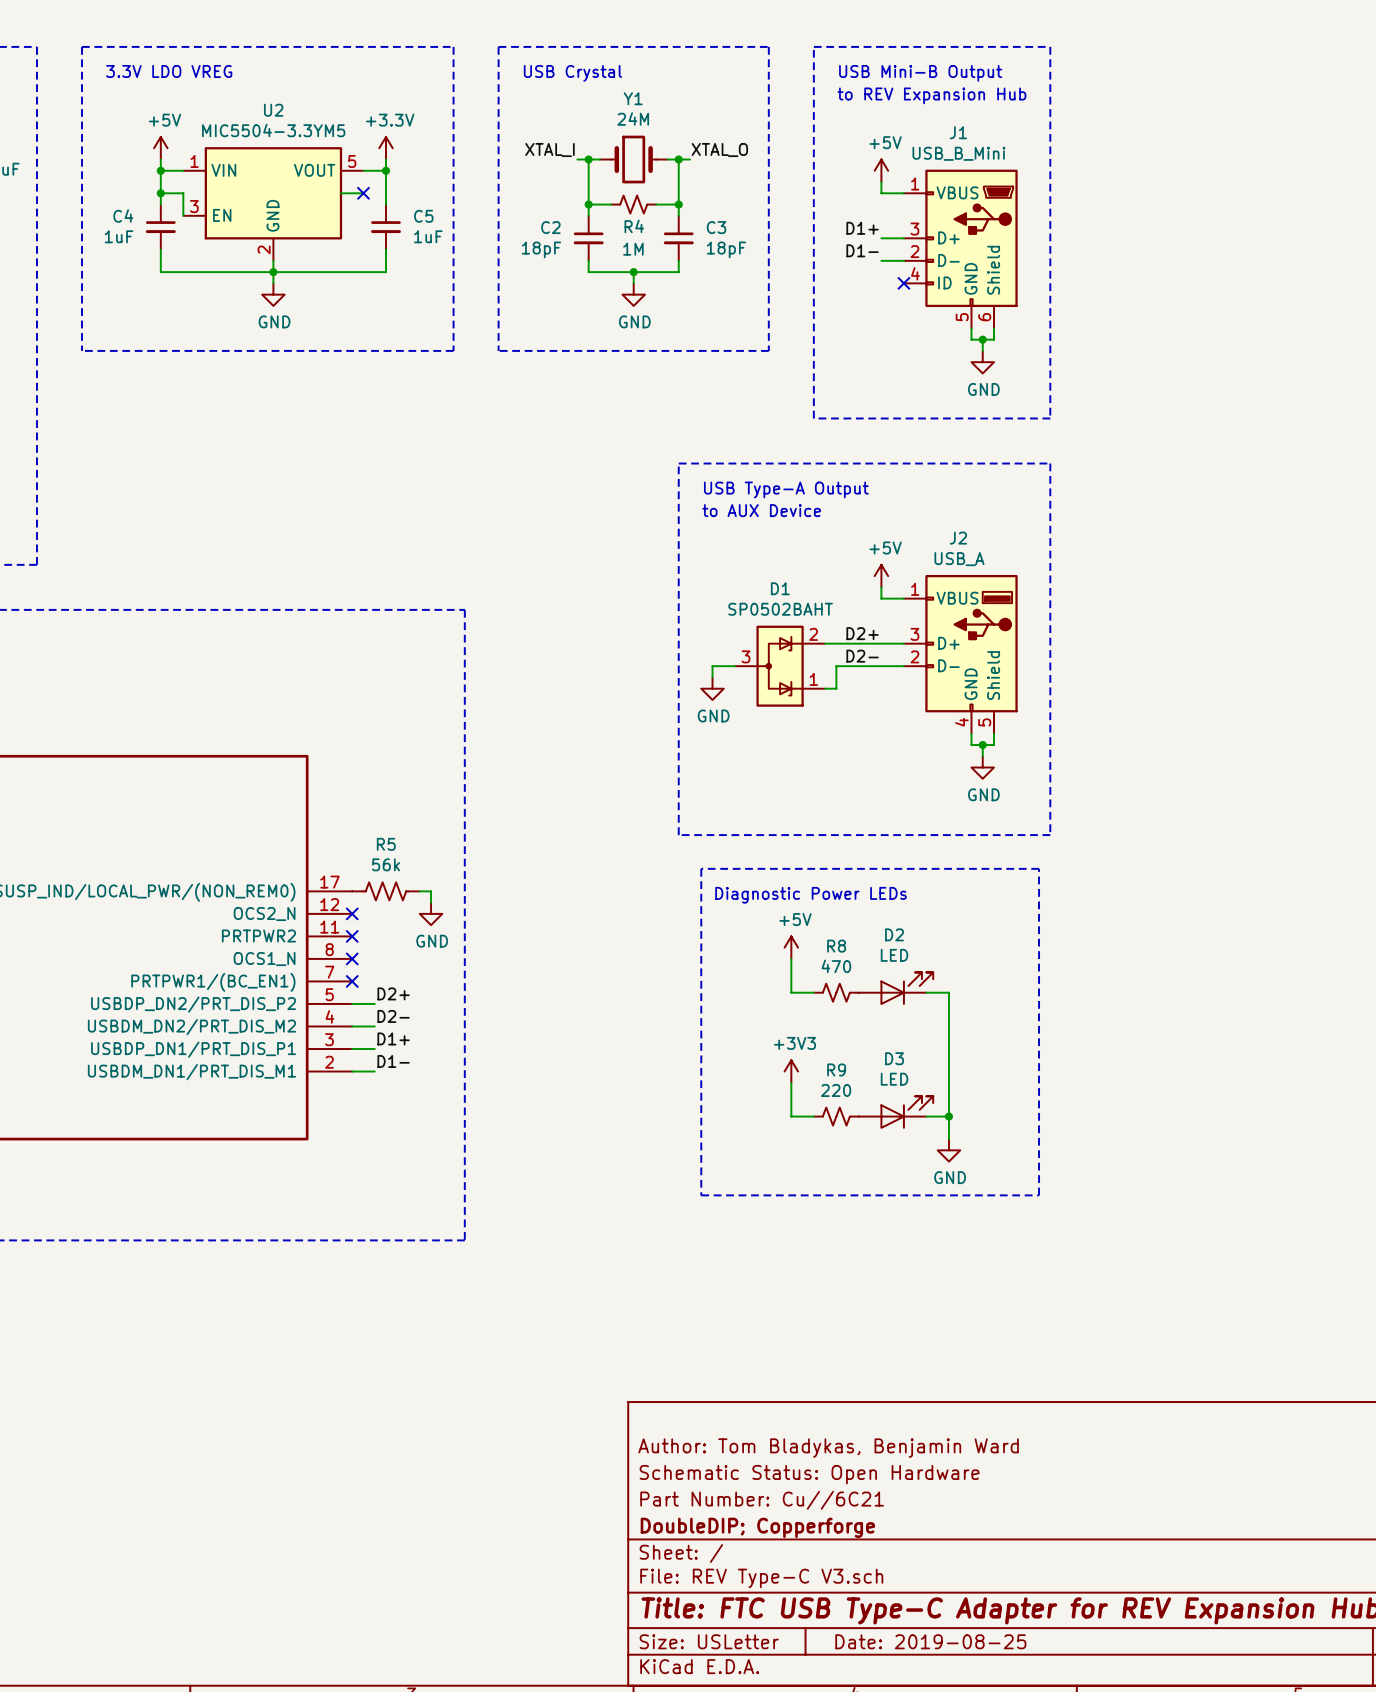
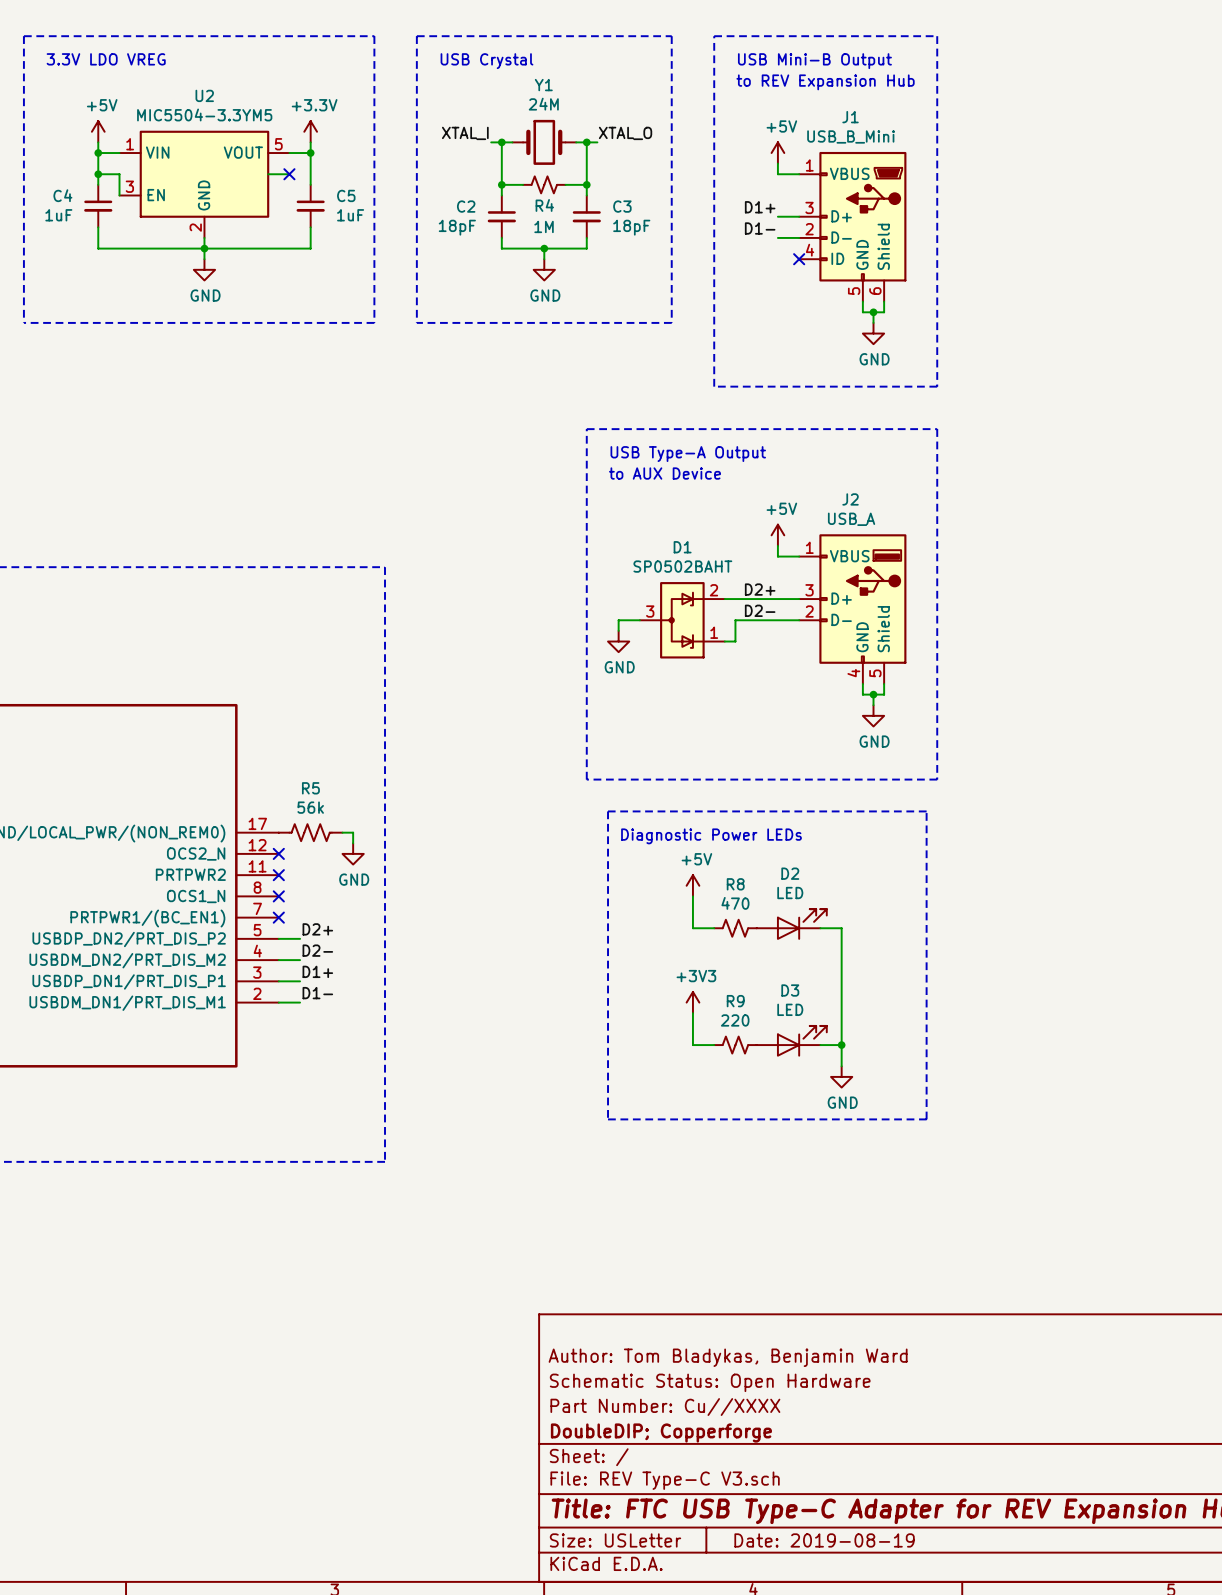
title block: Part Number: Cu//6C21 (762, 1500) -> Part Number: Cu//XXXX (665, 1407)
title block: Date: 2019-08-25 (930, 1641) -> Date: 2019-08-19 (824, 1540)

